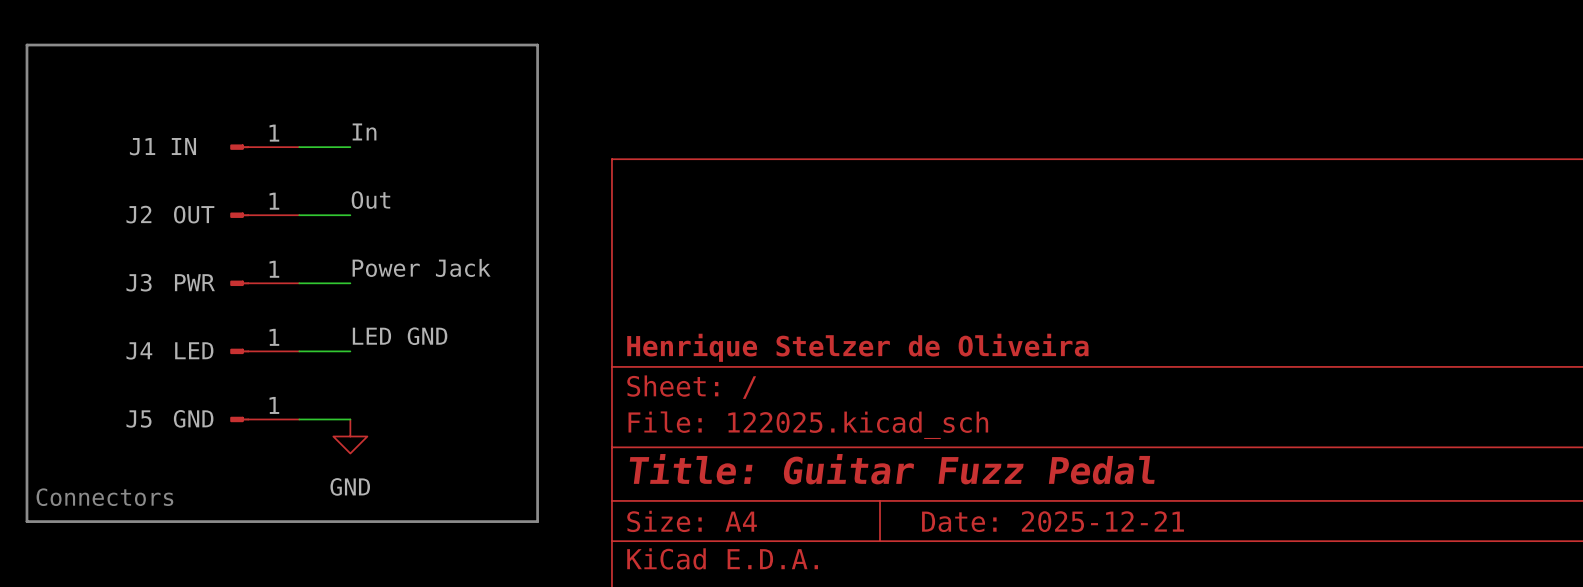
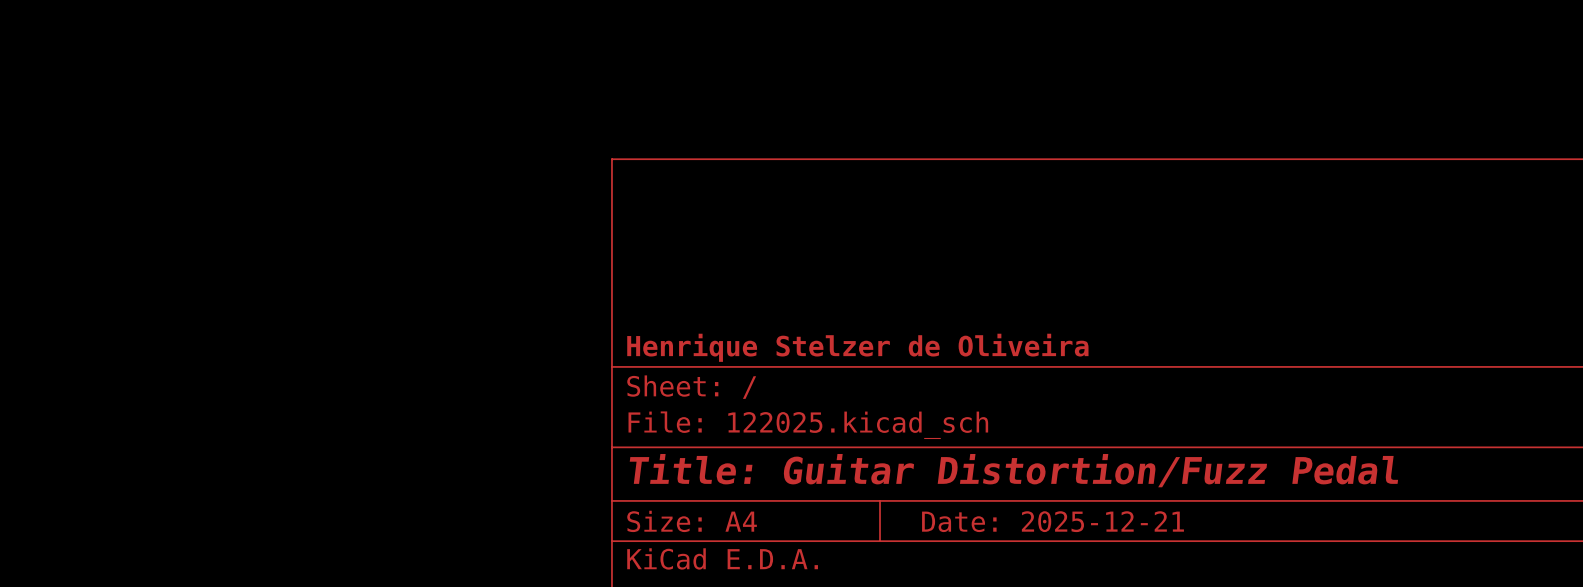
line: (26, 45) (537, 45) (537, 521) (26, 521) (26, 45) -> none
label: In (364, 131) -> none
J1: IN (264, 147) -> none
wire: (299, 147) (350, 147) -> none
label: Out (370, 200) -> none
J2: OUT (264, 215) -> none
wire: (299, 215) (350, 215) -> none
label: Power Jack (421, 267) -> none
J3: PWR (264, 283) -> none
wire: (299, 283) (350, 283) -> none
label: LED GND (400, 336) -> none
J4: LED (264, 351) -> none
wire: (299, 351) (350, 351) -> none
J5: GND (264, 419) -> none
wire: (299, 419) (350, 419) -> none
power symbol: GND (350, 436) -> none
title block: Title: Guitar Fuzz Pedal (892, 469) -> Title: Guitar Distortion/Fuzz Pedal (1013, 470)
text: Connectors (104, 497) -> none

